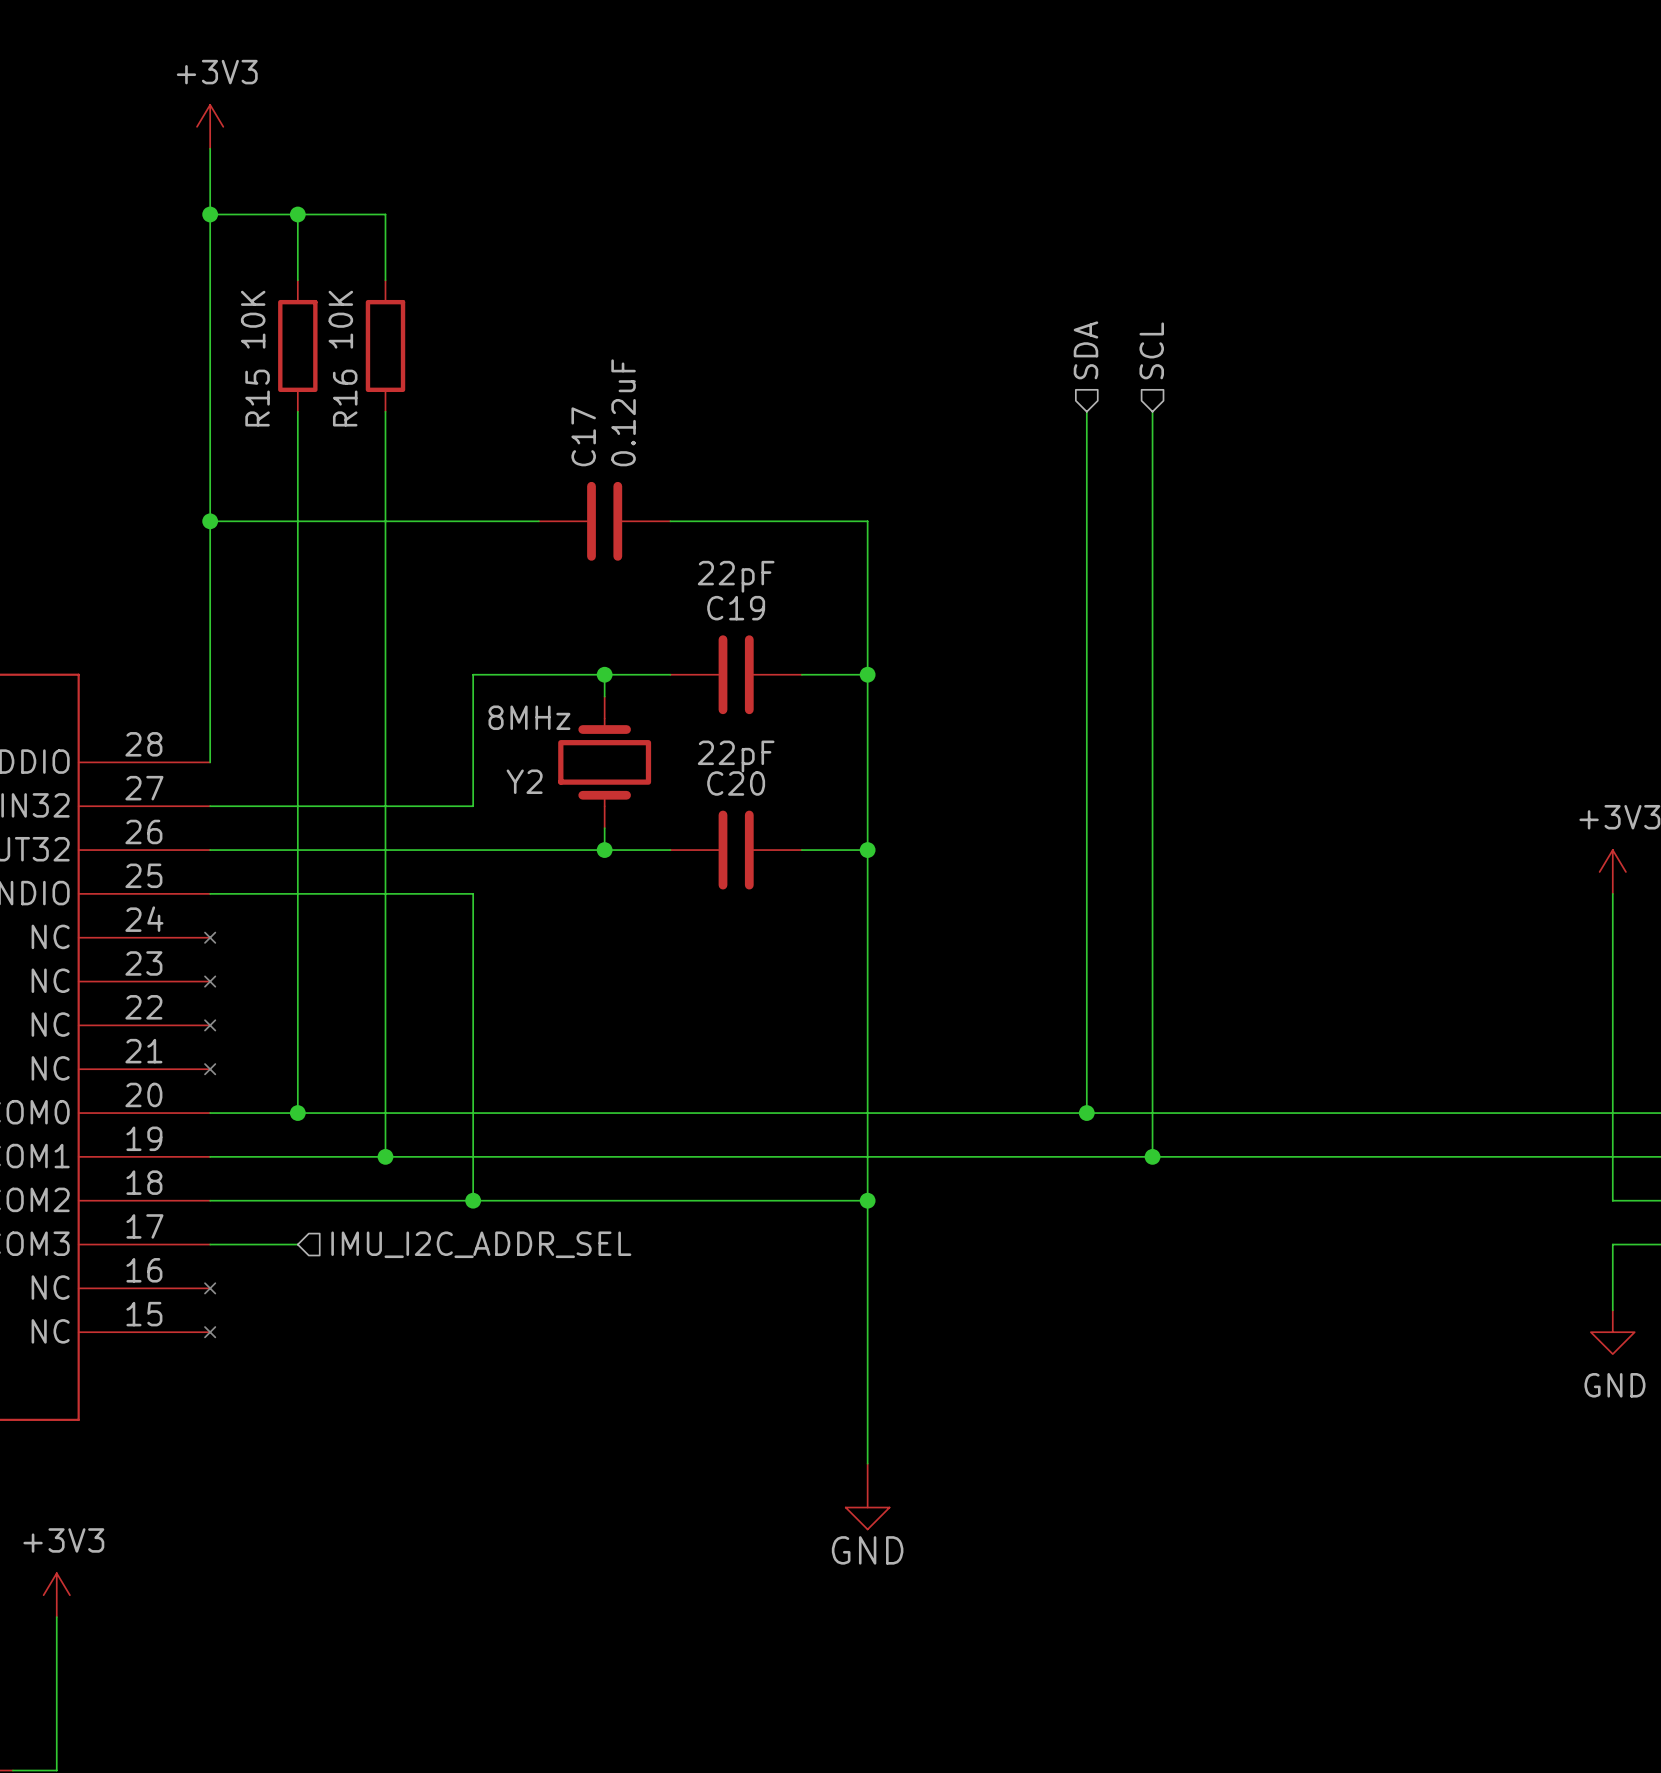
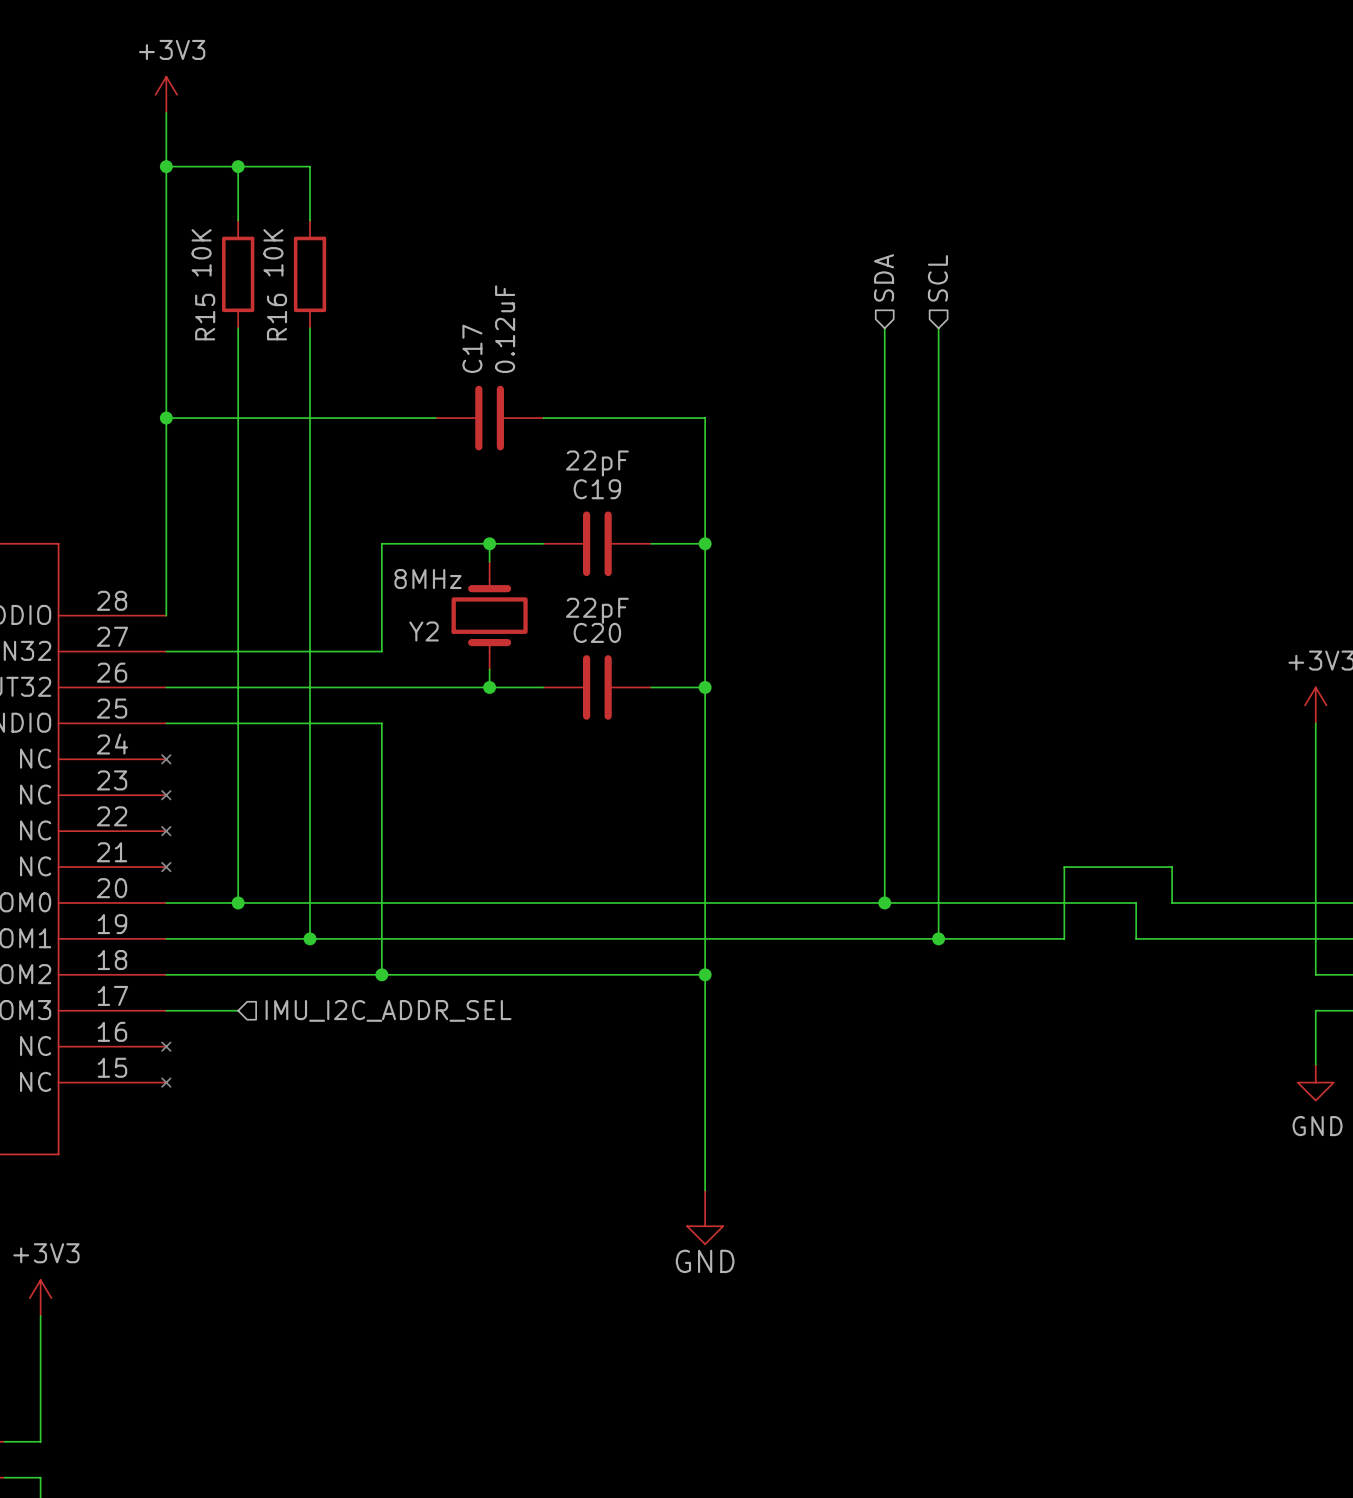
wire: (1393, 1113) (1437, 1113) -> (1136, 902) (1136, 938)
wire: (1305, 1156) (1393, 1156) -> (1064, 938) (1064, 867) (1172, 867) (1172, 902)

